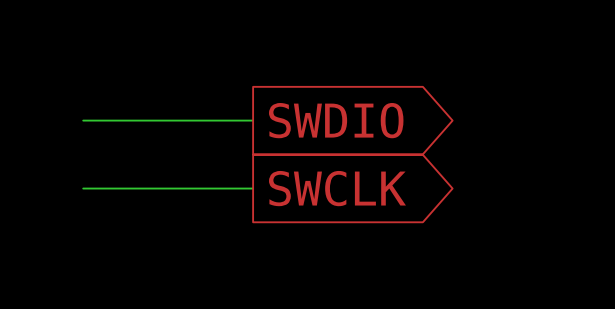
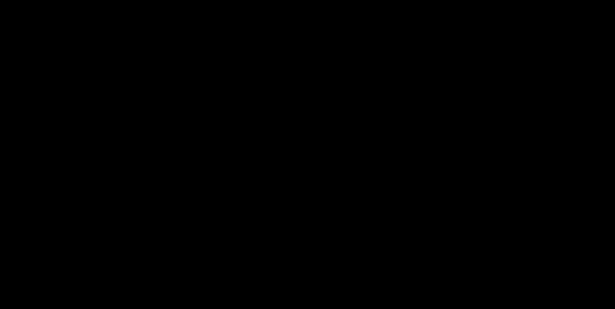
wire: (83, 120) (253, 120) -> none
global label: SWDIO (336, 120) -> none
wire: (83, 188) (253, 188) -> none
global label: SWCLK (337, 188) -> none

